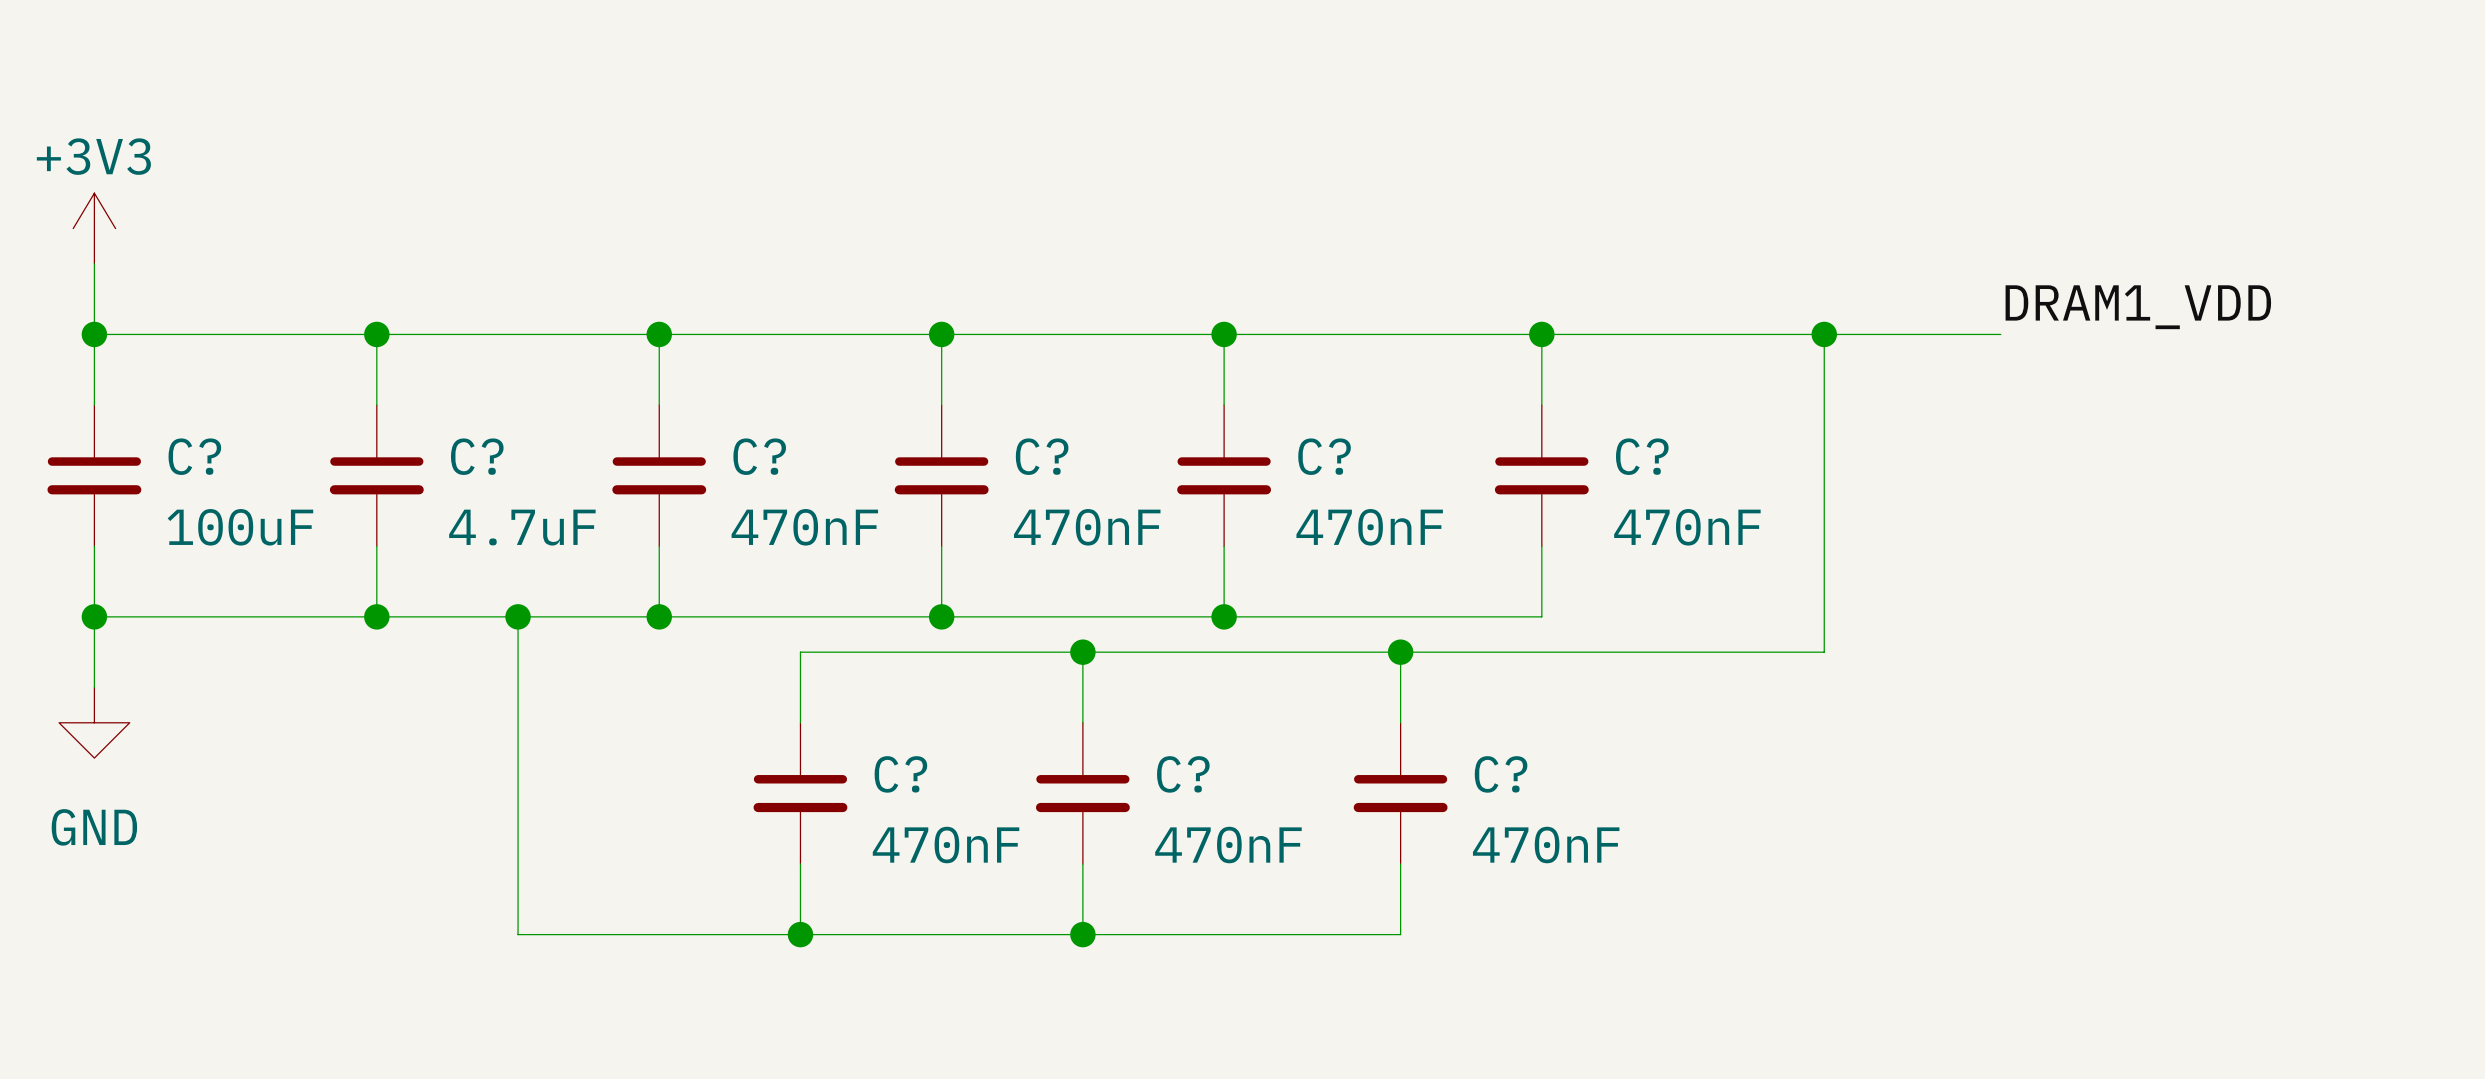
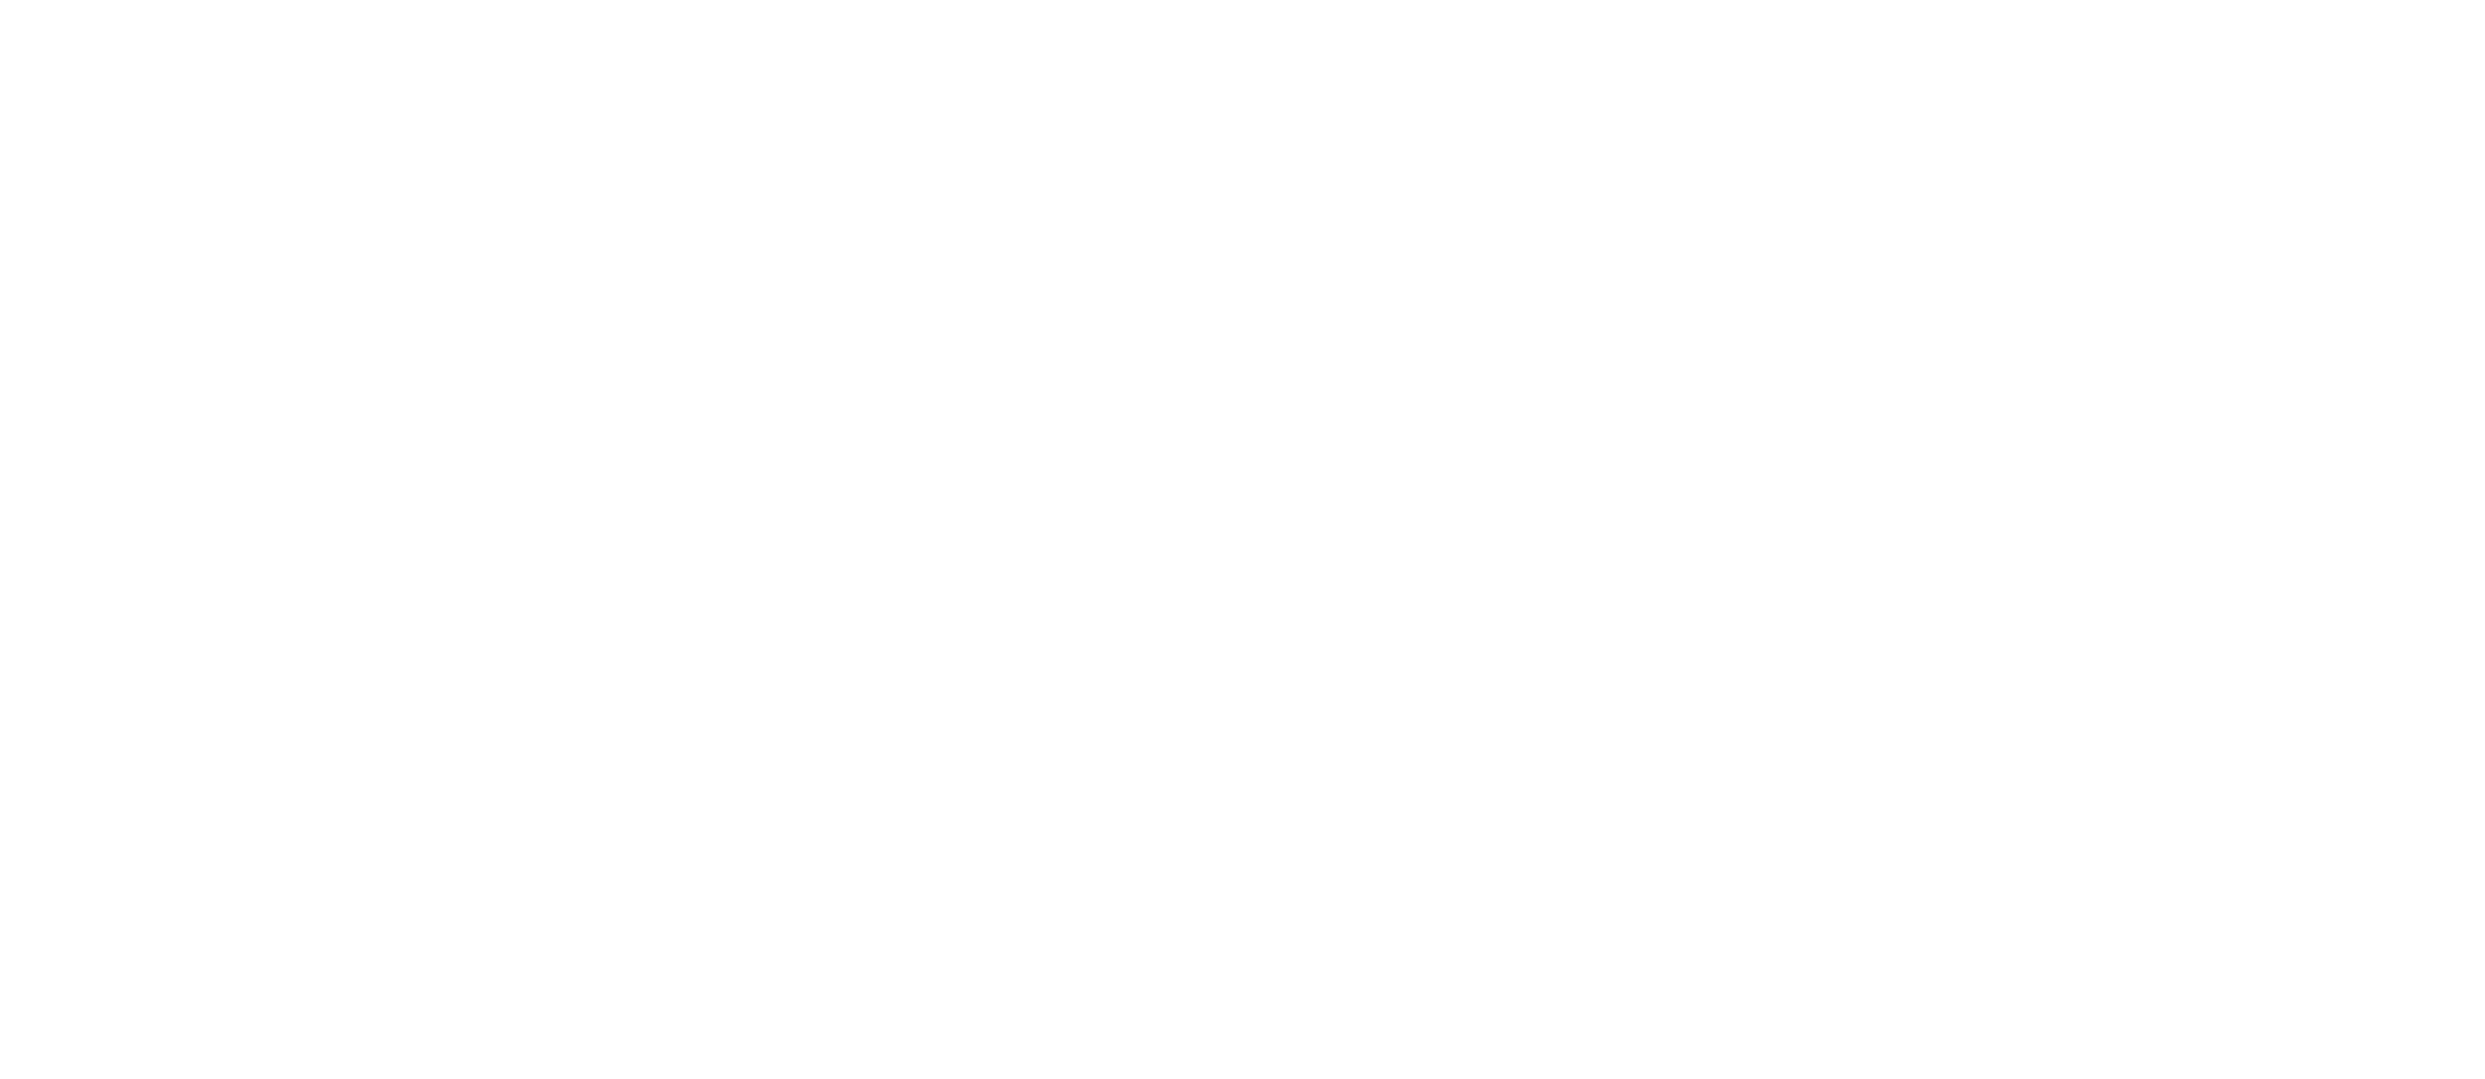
power symbol: +3V3 (94, 228) -> none
wire: (94, 263) (94, 405) -> none
label: DRAM1_VDD (2138, 307) -> none
wire: (94, 334) (2000, 334) -> none
junction: (94, 334) -> none
wire: (376, 334) (376, 405) -> none
junction: (376, 334) -> none
wire: (659, 334) (659, 405) -> none
junction: (659, 334) -> none
wire: (941, 334) (941, 405) -> none
junction: (941, 334) -> none
wire: (1224, 334) (1224, 405) -> none
junction: (1224, 334) -> none
wire: (1541, 334) (1541, 405) -> none
junction: (1541, 334) -> none
wire: (1824, 334) (1824, 652) (800, 652) (800, 722) -> none
junction: (1824, 334) -> none
C?: 100uF (94, 475) -> none
C?: 4.7uF (376, 475) -> none
C?: 470nF (659, 475) -> none
C?: 470nF (941, 475) -> none
C?: 470nF (1224, 475) -> none
C?: 470nF (1541, 475) -> none
wire: (94, 546) (94, 687) -> none
wire: (376, 546) (376, 616) -> none
wire: (659, 546) (659, 616) -> none
wire: (941, 546) (941, 616) -> none
wire: (1224, 546) (1224, 616) -> none
wire: (1541, 546) (1541, 616) (94, 616) -> none
junction: (94, 616) -> none
junction: (376, 616) -> none
wire: (518, 616) (518, 934) (1400, 934) (1400, 864) -> none
junction: (518, 616) -> none
junction: (659, 616) -> none
junction: (941, 616) -> none
junction: (1224, 616) -> none
wire: (1082, 652) (1082, 722) -> none
junction: (1082, 652) -> none
wire: (1400, 652) (1400, 722) -> none
junction: (1400, 652) -> none
power symbol: GND (94, 722) -> none
C?: 470nF (800, 793) -> none
C?: 470nF (1082, 793) -> none
C?: 470nF (1400, 793) -> none
wire: (800, 864) (800, 934) -> none
wire: (1082, 864) (1082, 934) -> none
junction: (800, 934) -> none
junction: (1082, 934) -> none

